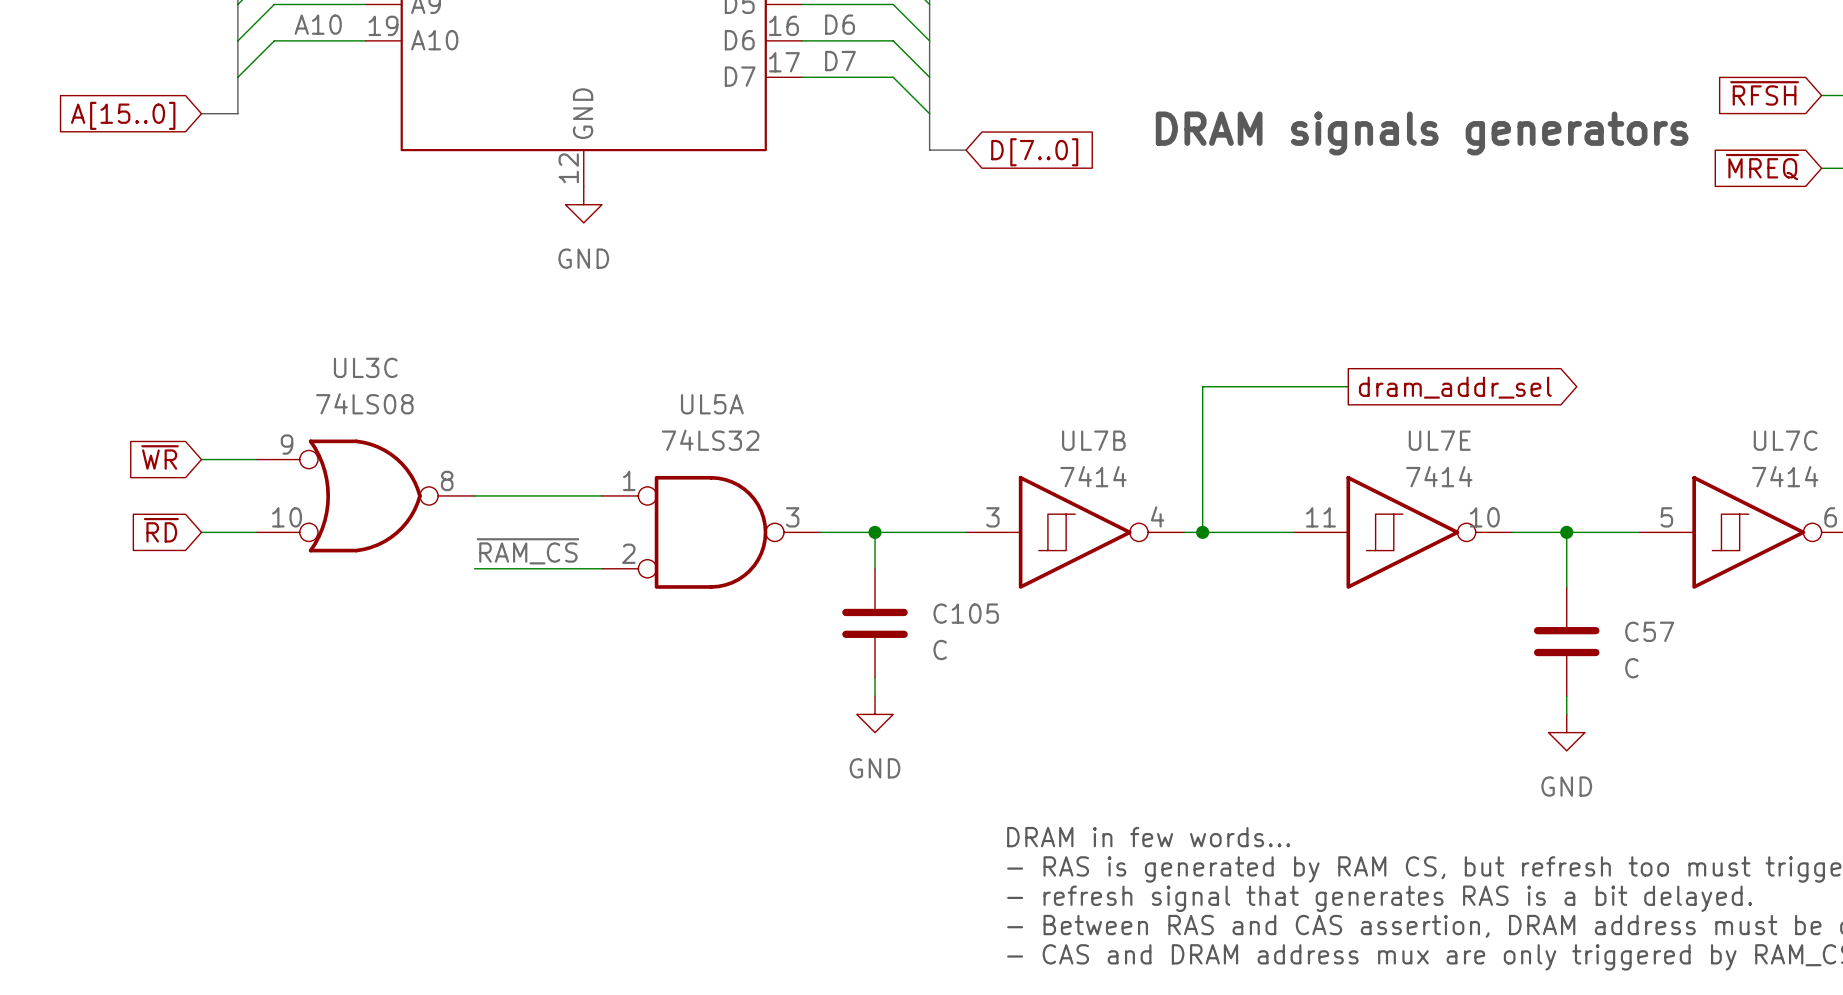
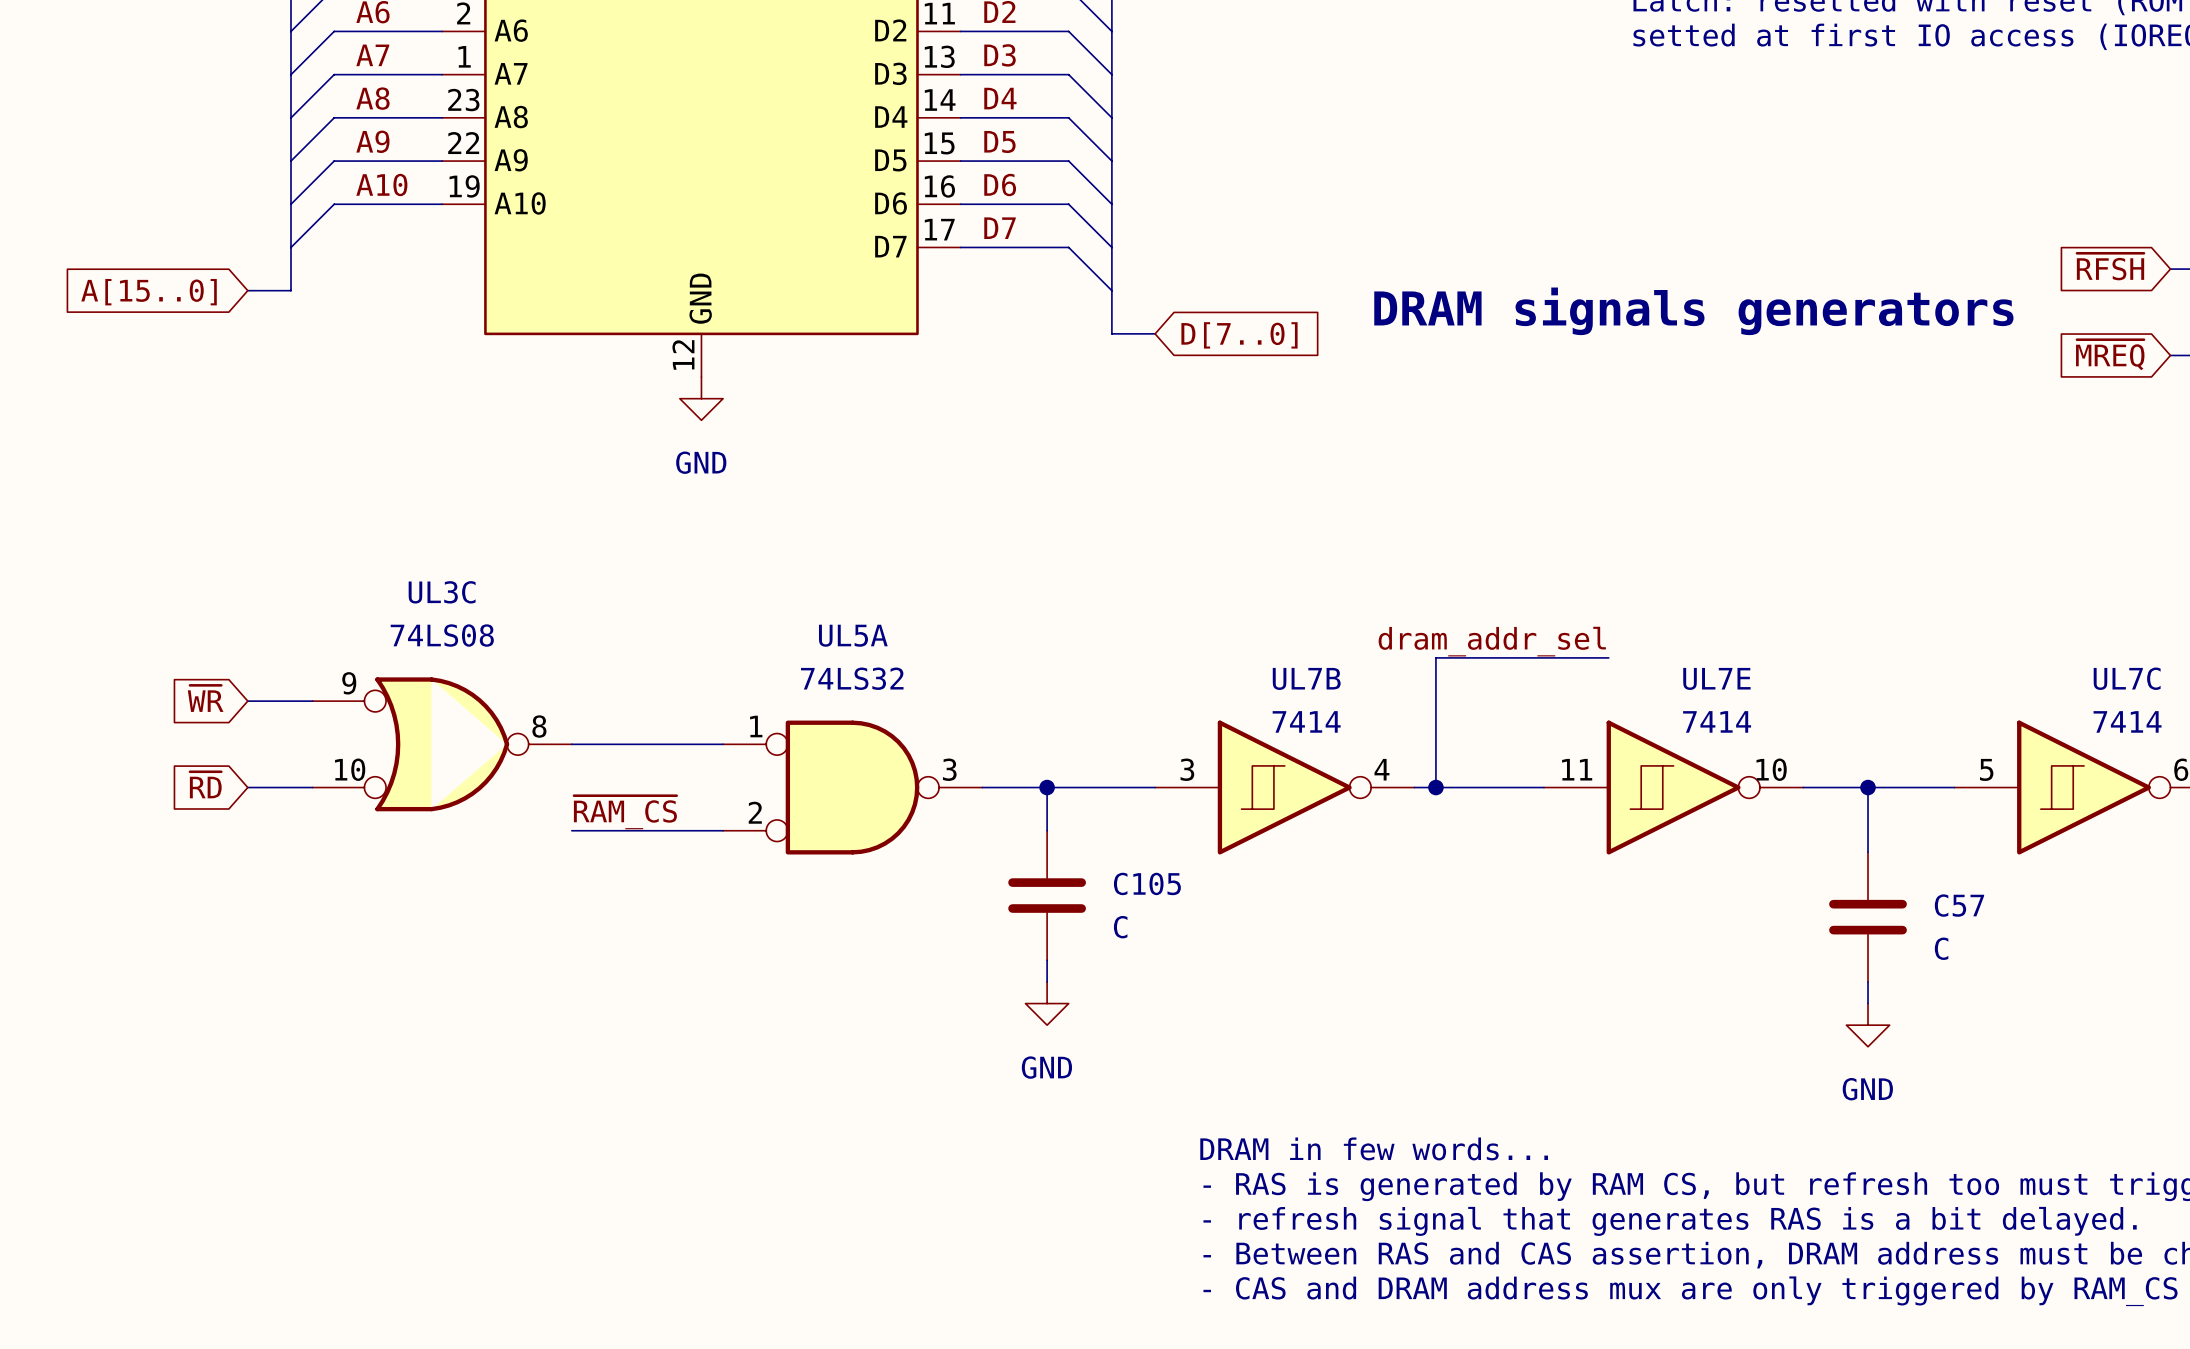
wire: (1348, 386) (1202, 386) (1202, 423) -> (1608, 657) (1435, 657)
global label: dram_addr_sel (1455, 387) -> none
label: none -> dram_addr_sel (1492, 641)

